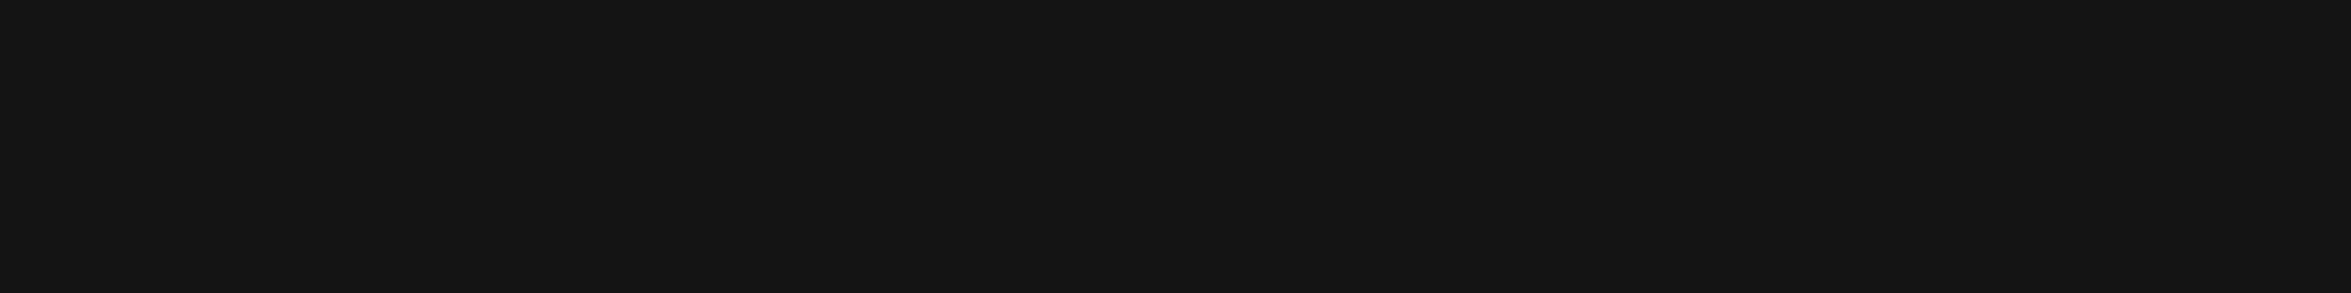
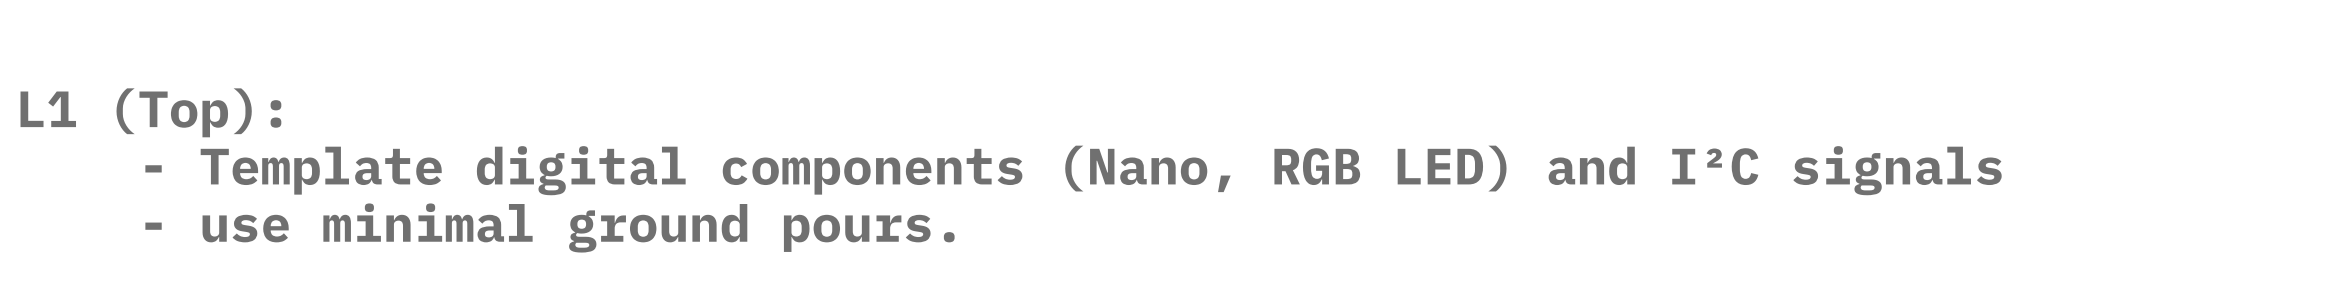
text: none -> L1 (Top): (150, 112)
text: none -> - Template digital components (Nano, RGB LED) and I²C signals (1073, 170)
text: none -> - use minimal ground pours. (549, 227)

